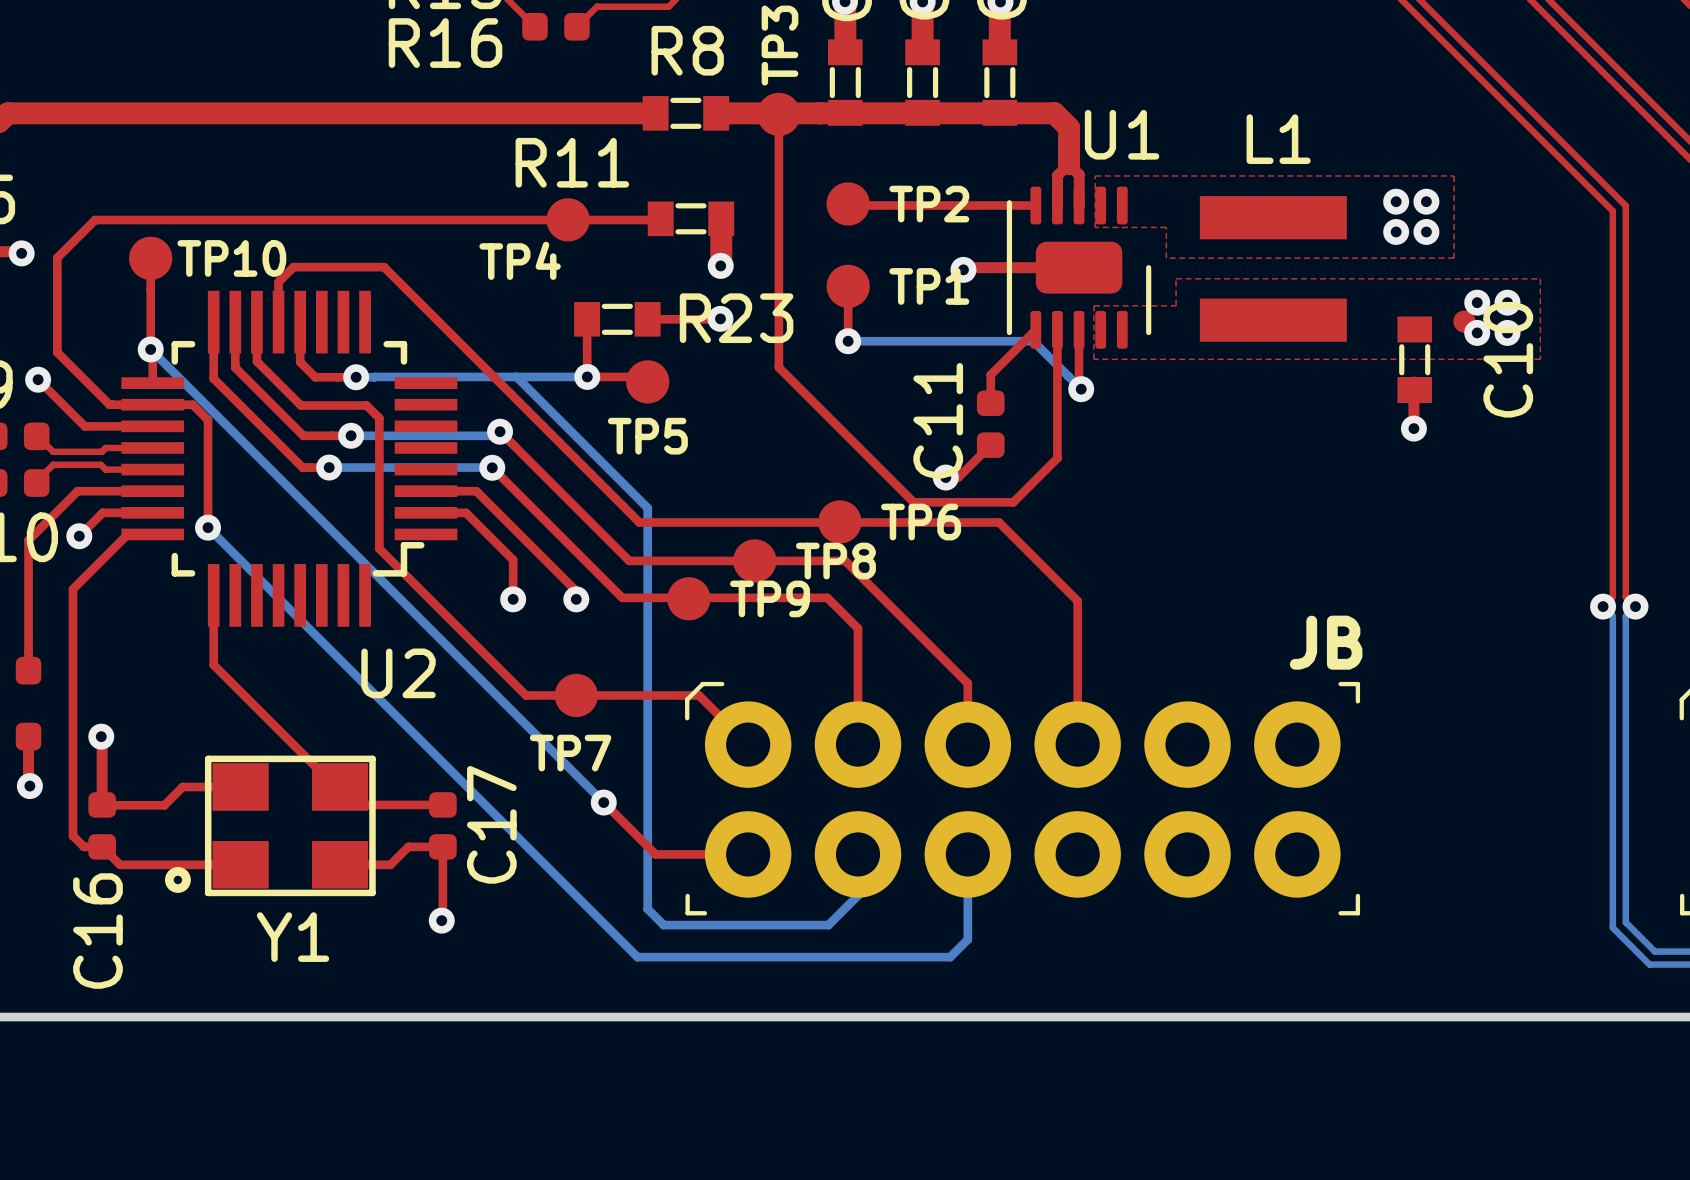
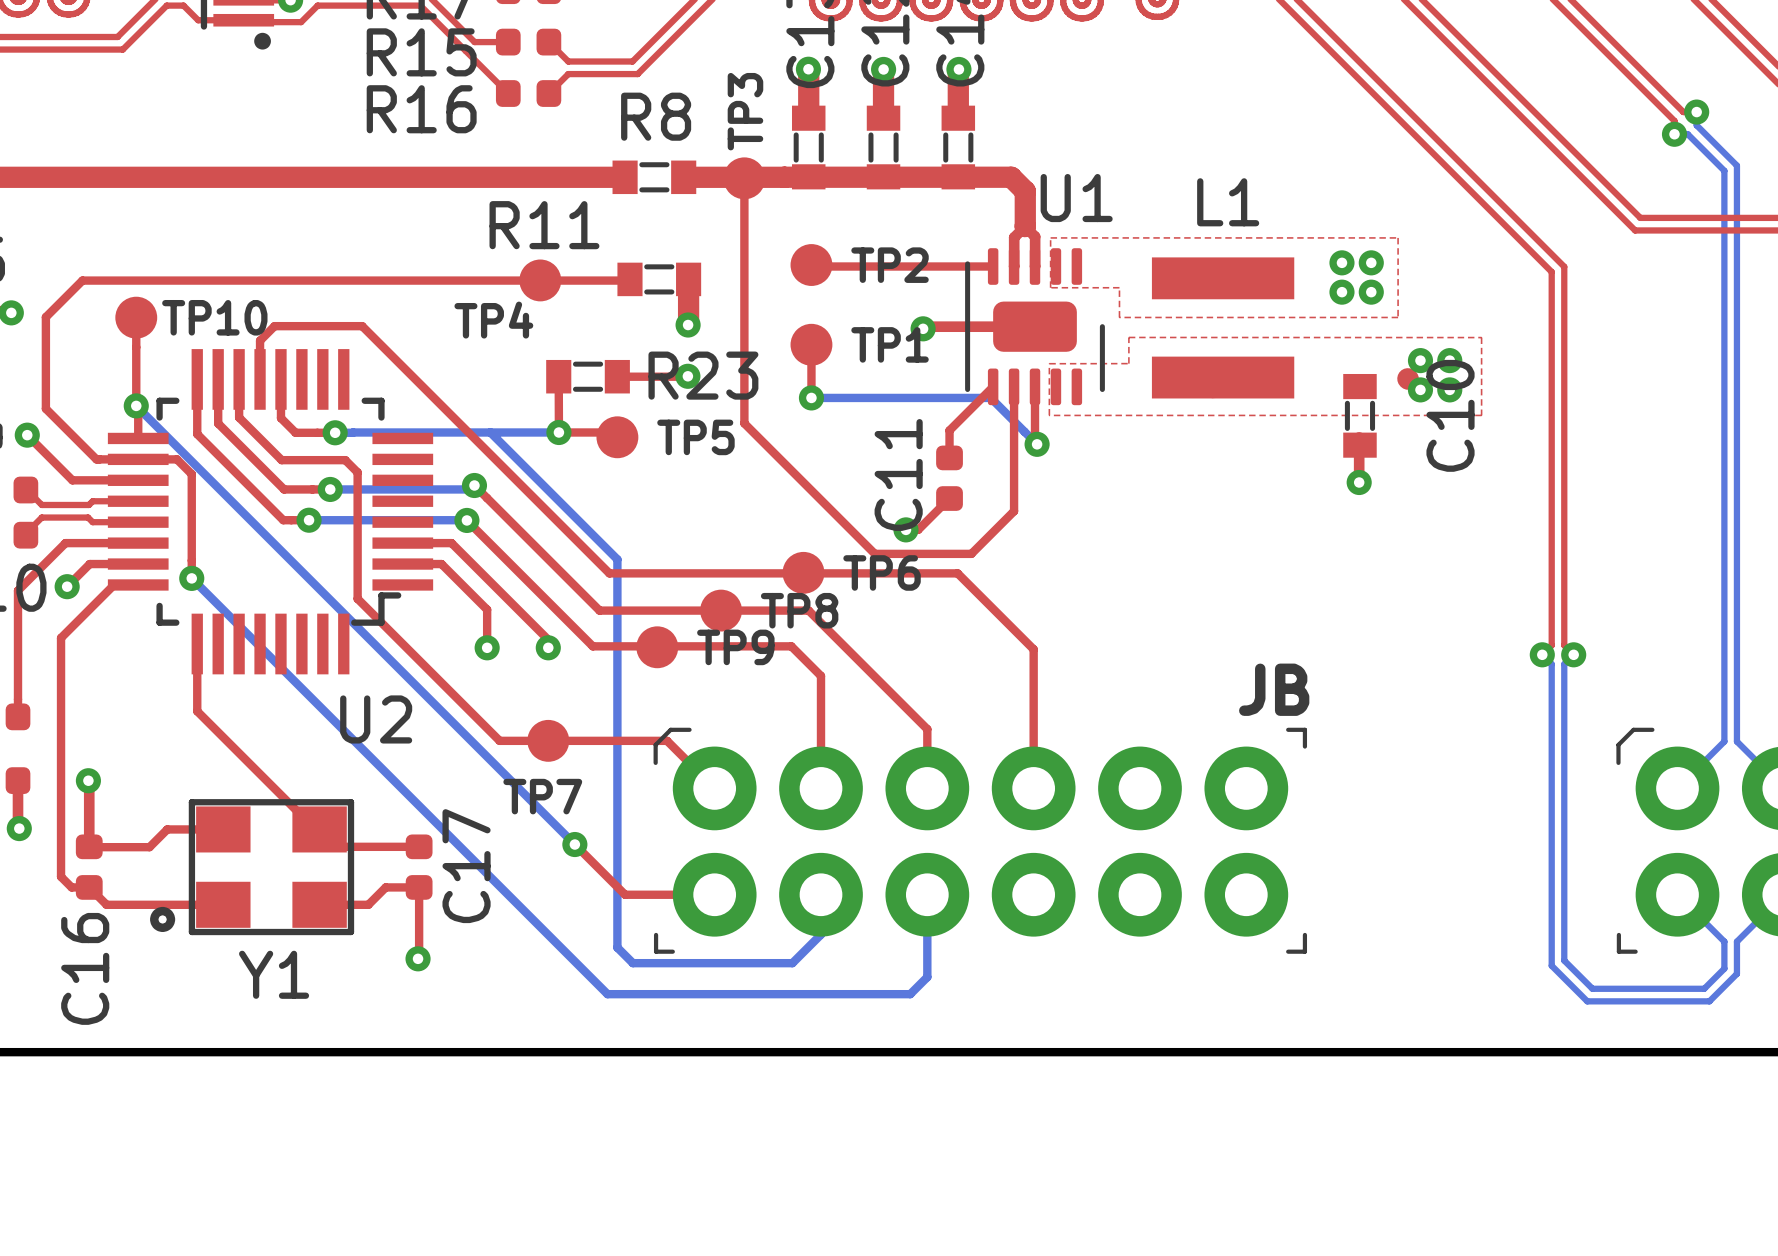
TP5 name position: TP5 (647, 436) -> TP5 (695, 437)

